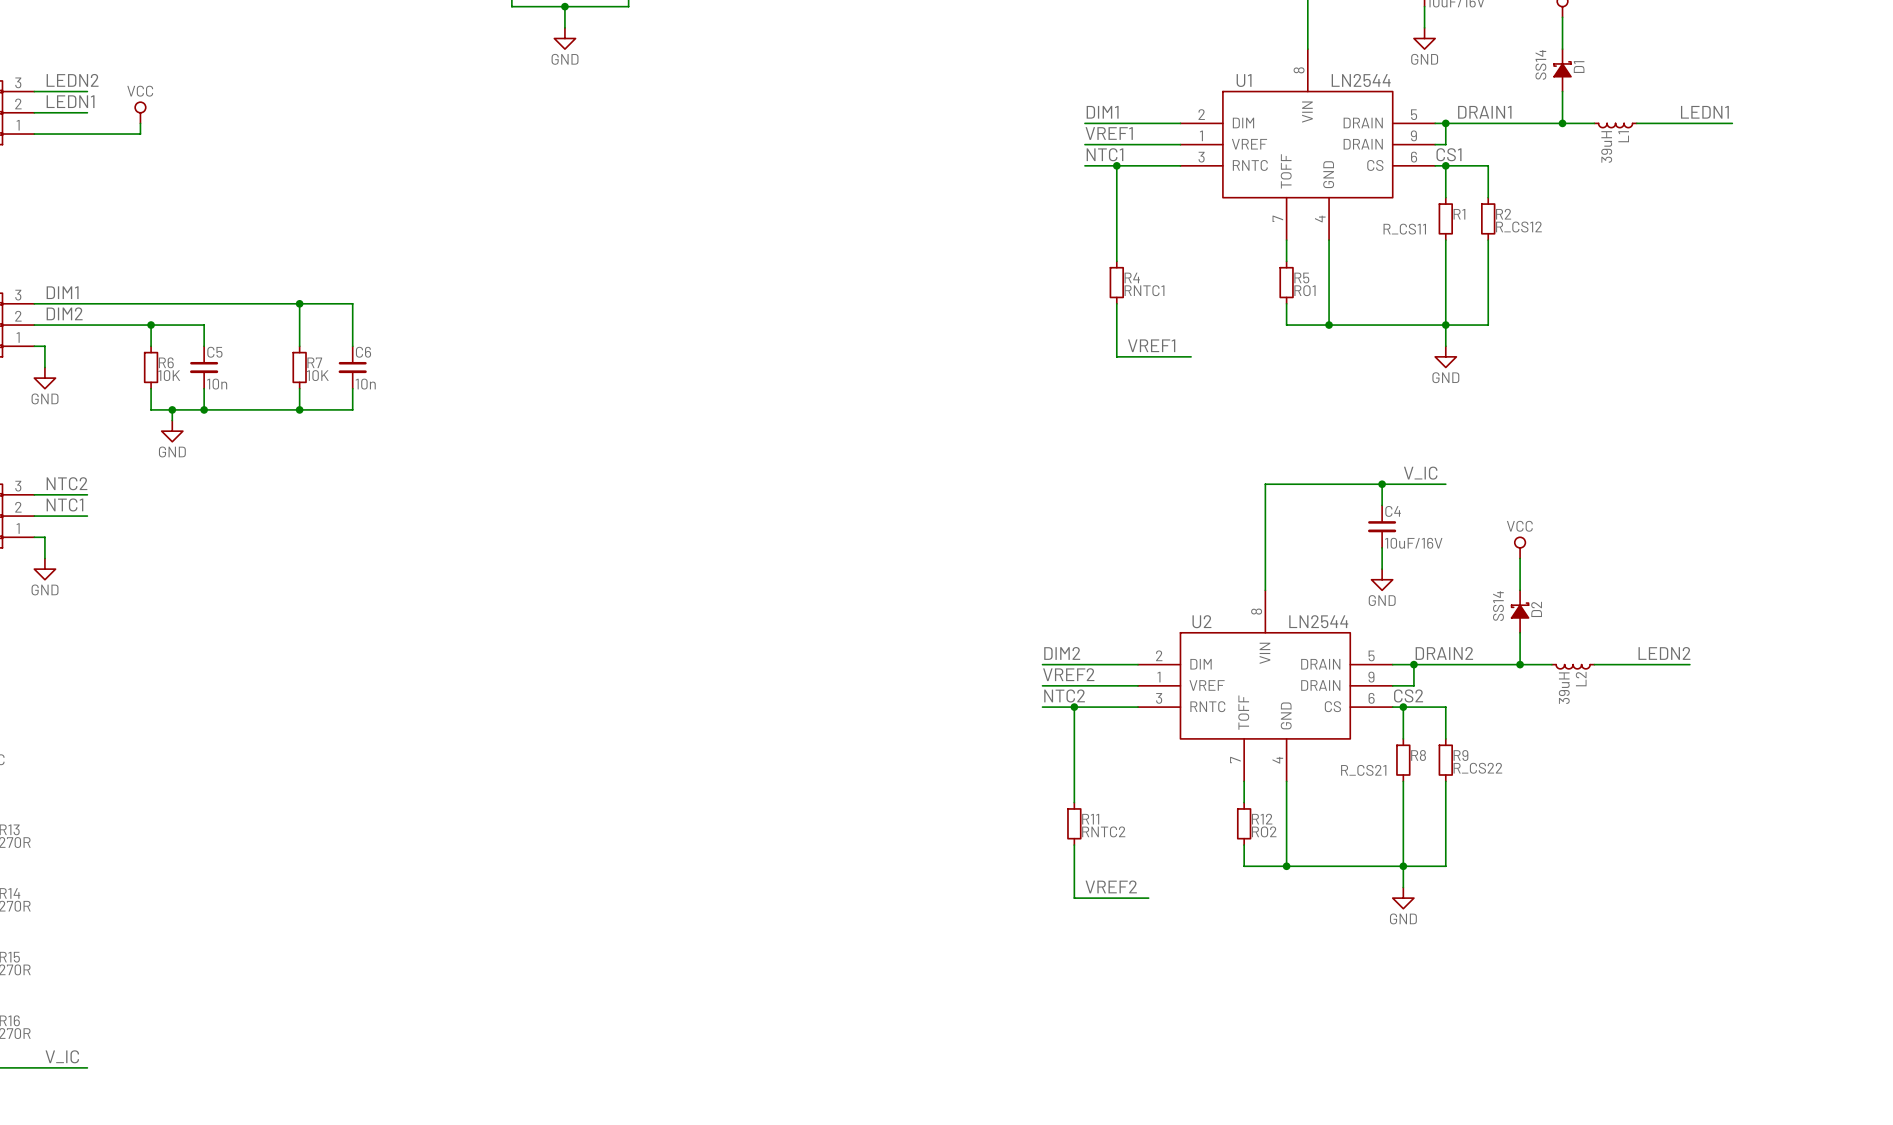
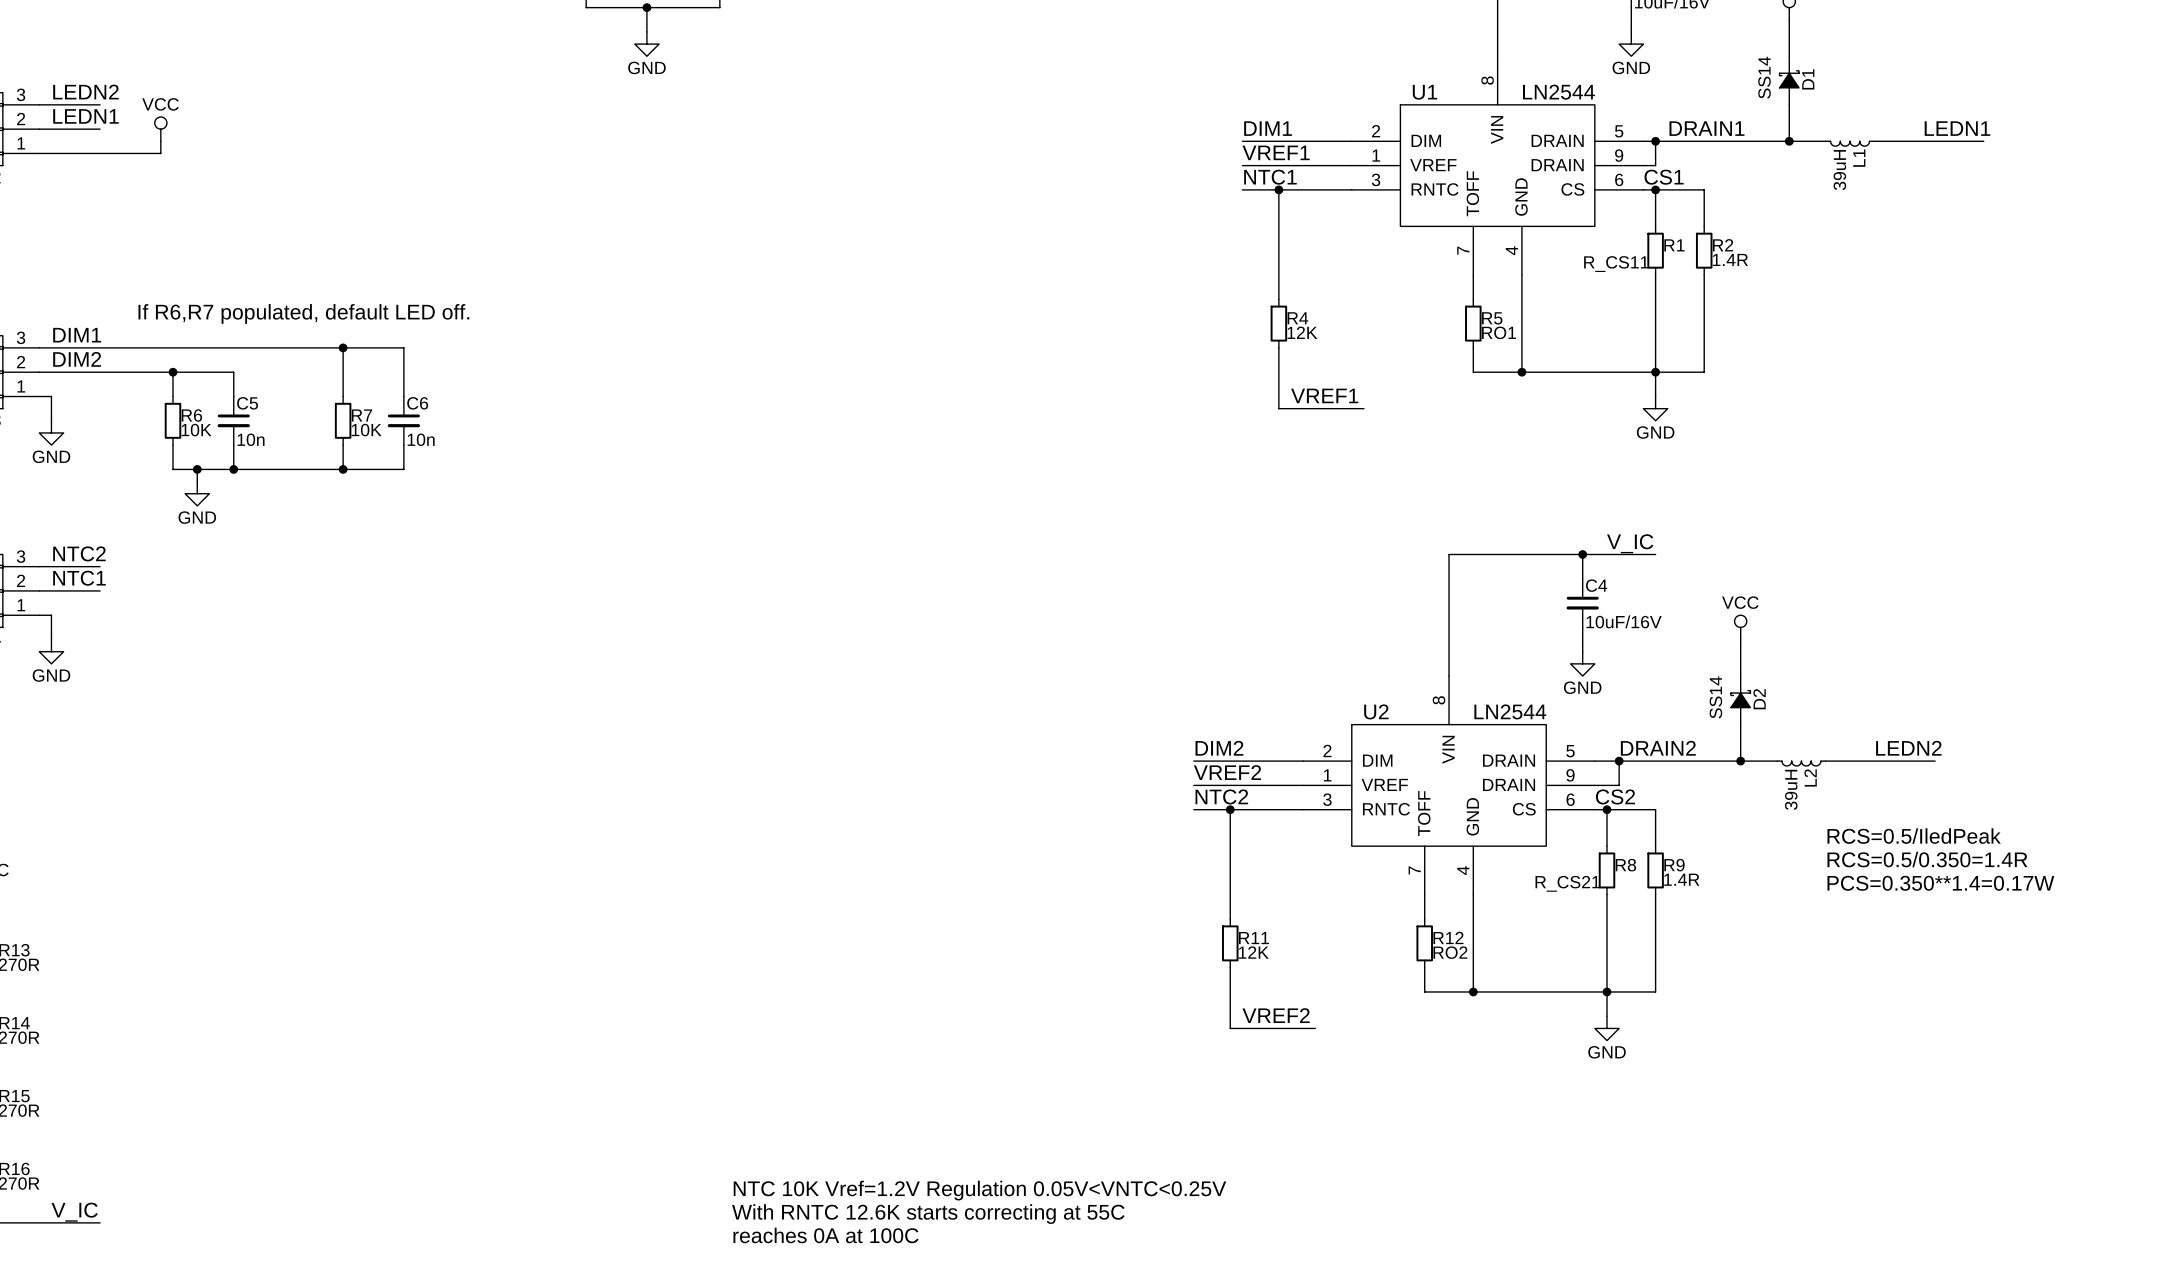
R2 value: R_CS12 (1518, 227) -> 1.4R (1730, 259)
text: none -> If R6,R7 populated, default LED off. (303, 313)
R4 value: RNTC1 (1144, 290) -> 12K (1302, 332)
text: none -> RCS=0.5/IledPeak (1914, 836)
text: none -> RCS=0.5/0.350=1.4R (1927, 859)
R9 value: R_CS22 (1477, 768) -> 1.4R (1681, 879)
text: none -> PCS=0.350**1.4=0.17W (1940, 883)
R11 value: RNTC2 (1103, 831) -> 12K (1253, 952)
text: none -> NTC 10K Vref=1.2V Regulation 0.05V<VNTC<0.25V (979, 1190)
text: none -> With RNTC 12.6K starts correcting at 55C (928, 1214)
text: none -> reaches 0A at 100C (825, 1235)

